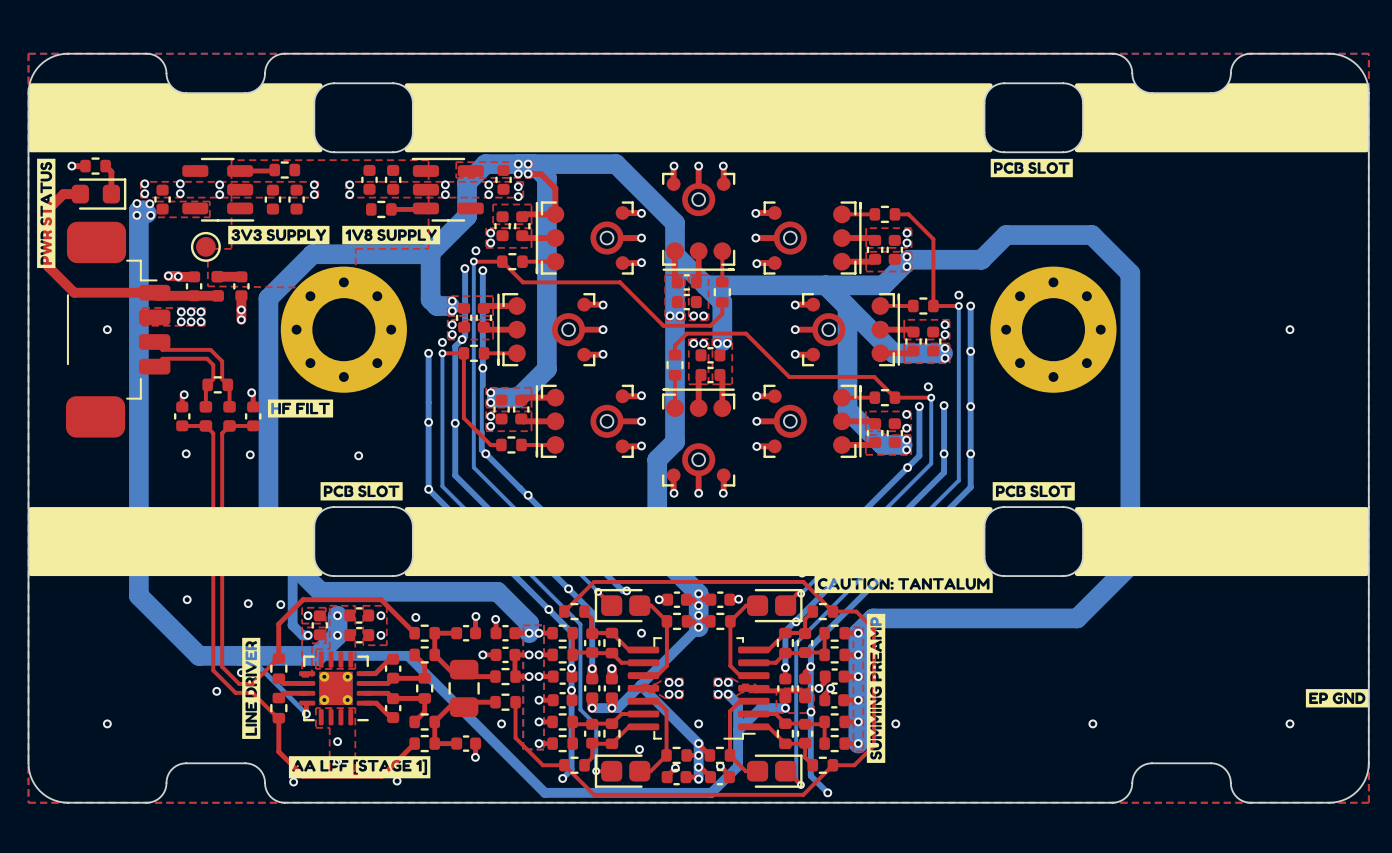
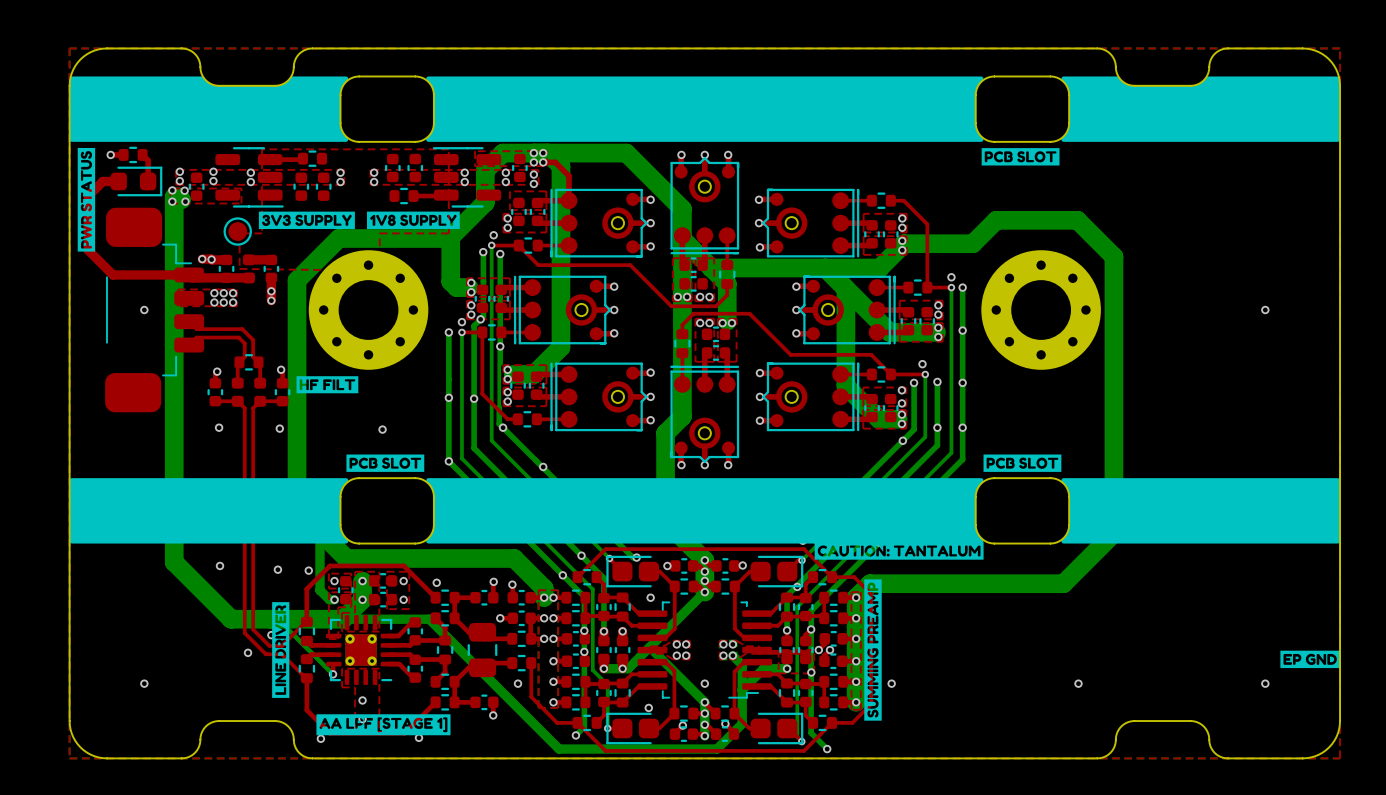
part footprint: [662, 172, 736, 271] -> [670, 157, 740, 255]
part footprint: [535, 201, 634, 275] -> [550, 188, 648, 258]
part footprint: [763, 201, 862, 275] -> [762, 188, 860, 258]
part footprint: [497, 293, 596, 367] -> [513, 275, 612, 345]
part footprint: [801, 293, 901, 367] -> [798, 275, 896, 345]
part footprint: [535, 384, 634, 458] -> [550, 362, 648, 432]
part footprint: [763, 384, 862, 458] -> [762, 362, 860, 432]
part footprint: [662, 388, 736, 487] -> [670, 365, 740, 463]

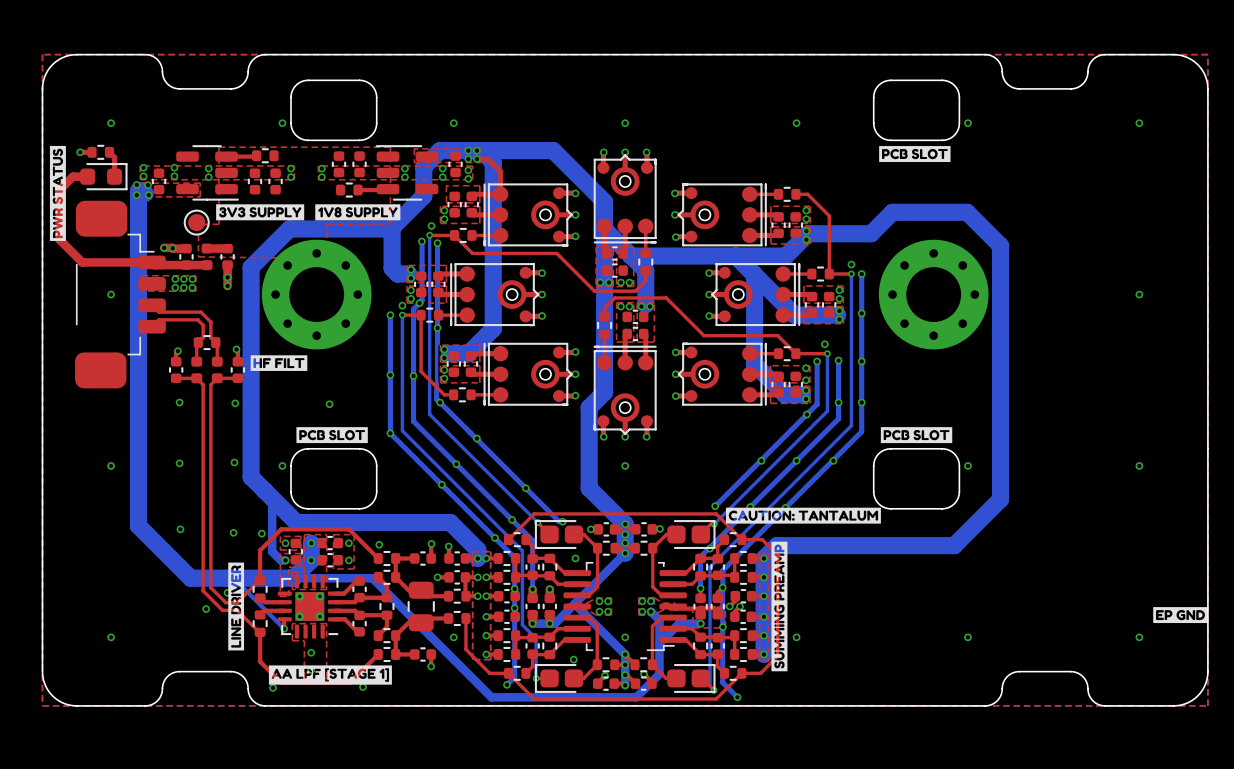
drawing: [69, 76, 349, 142] -> none
drawing: [426, 76, 984, 142] -> none
drawing: [1061, 76, 1341, 142] -> none
drawing: [69, 478, 349, 544] -> none
drawing: [426, 478, 984, 544] -> none
drawing: [1061, 478, 1341, 544] -> none

